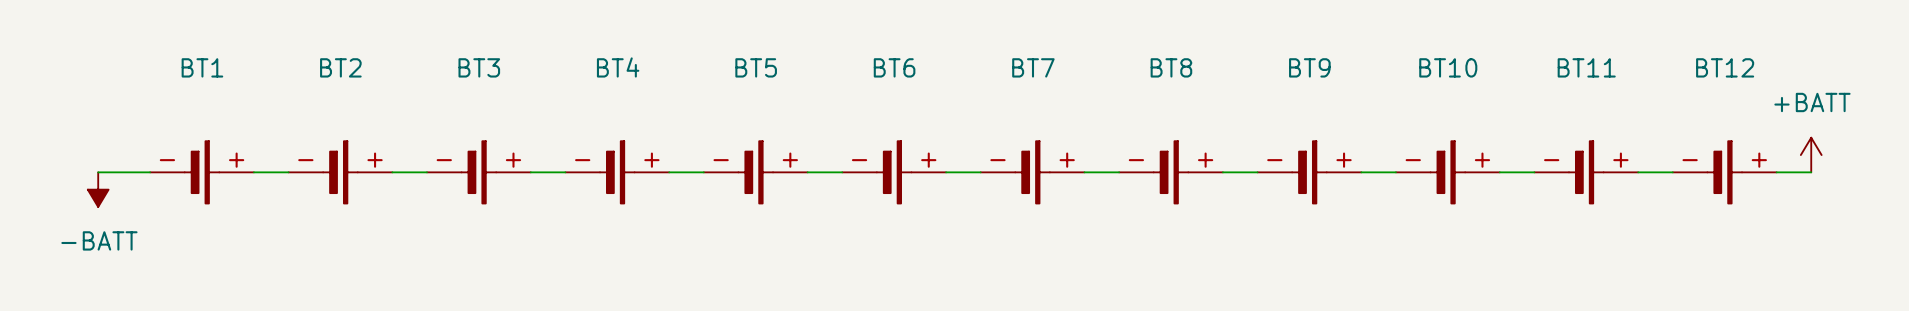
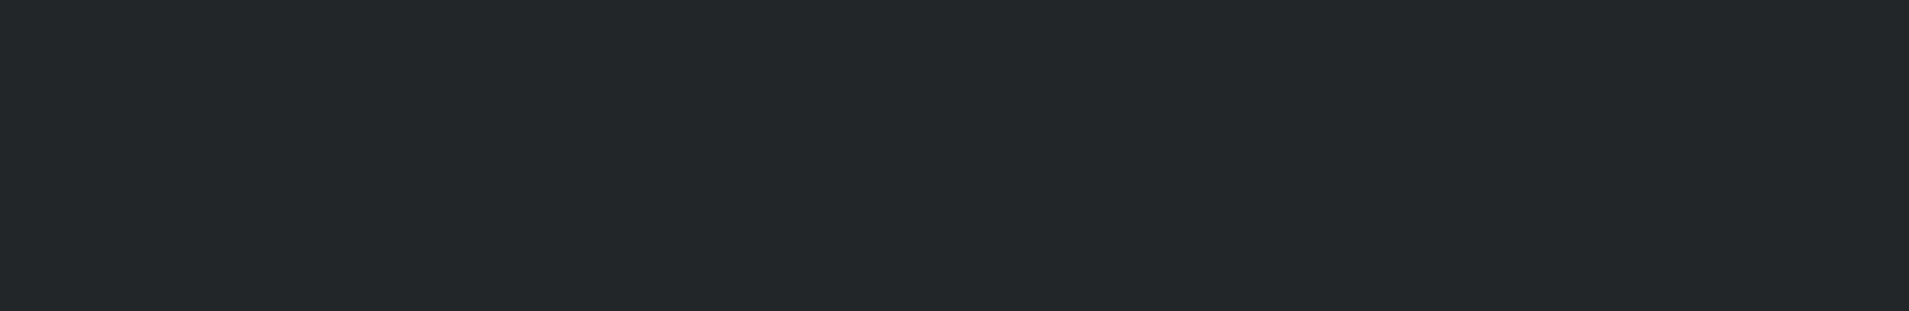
power symbol: +BATT (1811, 155) -> none
wire: (98, 172) (150, 172) -> none
BT1: (202, 172) -> none
wire: (253, 172) (288, 172) -> none
BT2: (340, 172) -> none
wire: (392, 172) (426, 172) -> none
BT3: (478, 172) -> none
wire: (530, 172) (565, 172) -> none
BT4: (617, 172) -> none
wire: (669, 172) (703, 172) -> none
BT5: (755, 172) -> none
wire: (807, 172) (842, 172) -> none
BT6: (894, 172) -> none
wire: (946, 172) (980, 172) -> none
BT7: (1032, 172) -> none
wire: (1084, 172) (1119, 172) -> none
BT8: (1171, 172) -> none
wire: (1222, 172) (1257, 172) -> none
BT9: (1309, 172) -> none
wire: (1361, 172) (1395, 172) -> none
BT10: (1447, 172) -> none
wire: (1499, 172) (1534, 172) -> none
BT11: (1586, 172) -> none
wire: (1638, 172) (1672, 172) -> none
BT12: (1724, 172) -> none
wire: (1776, 172) (1811, 172) -> none
power symbol: -BATT (98, 189) -> none

